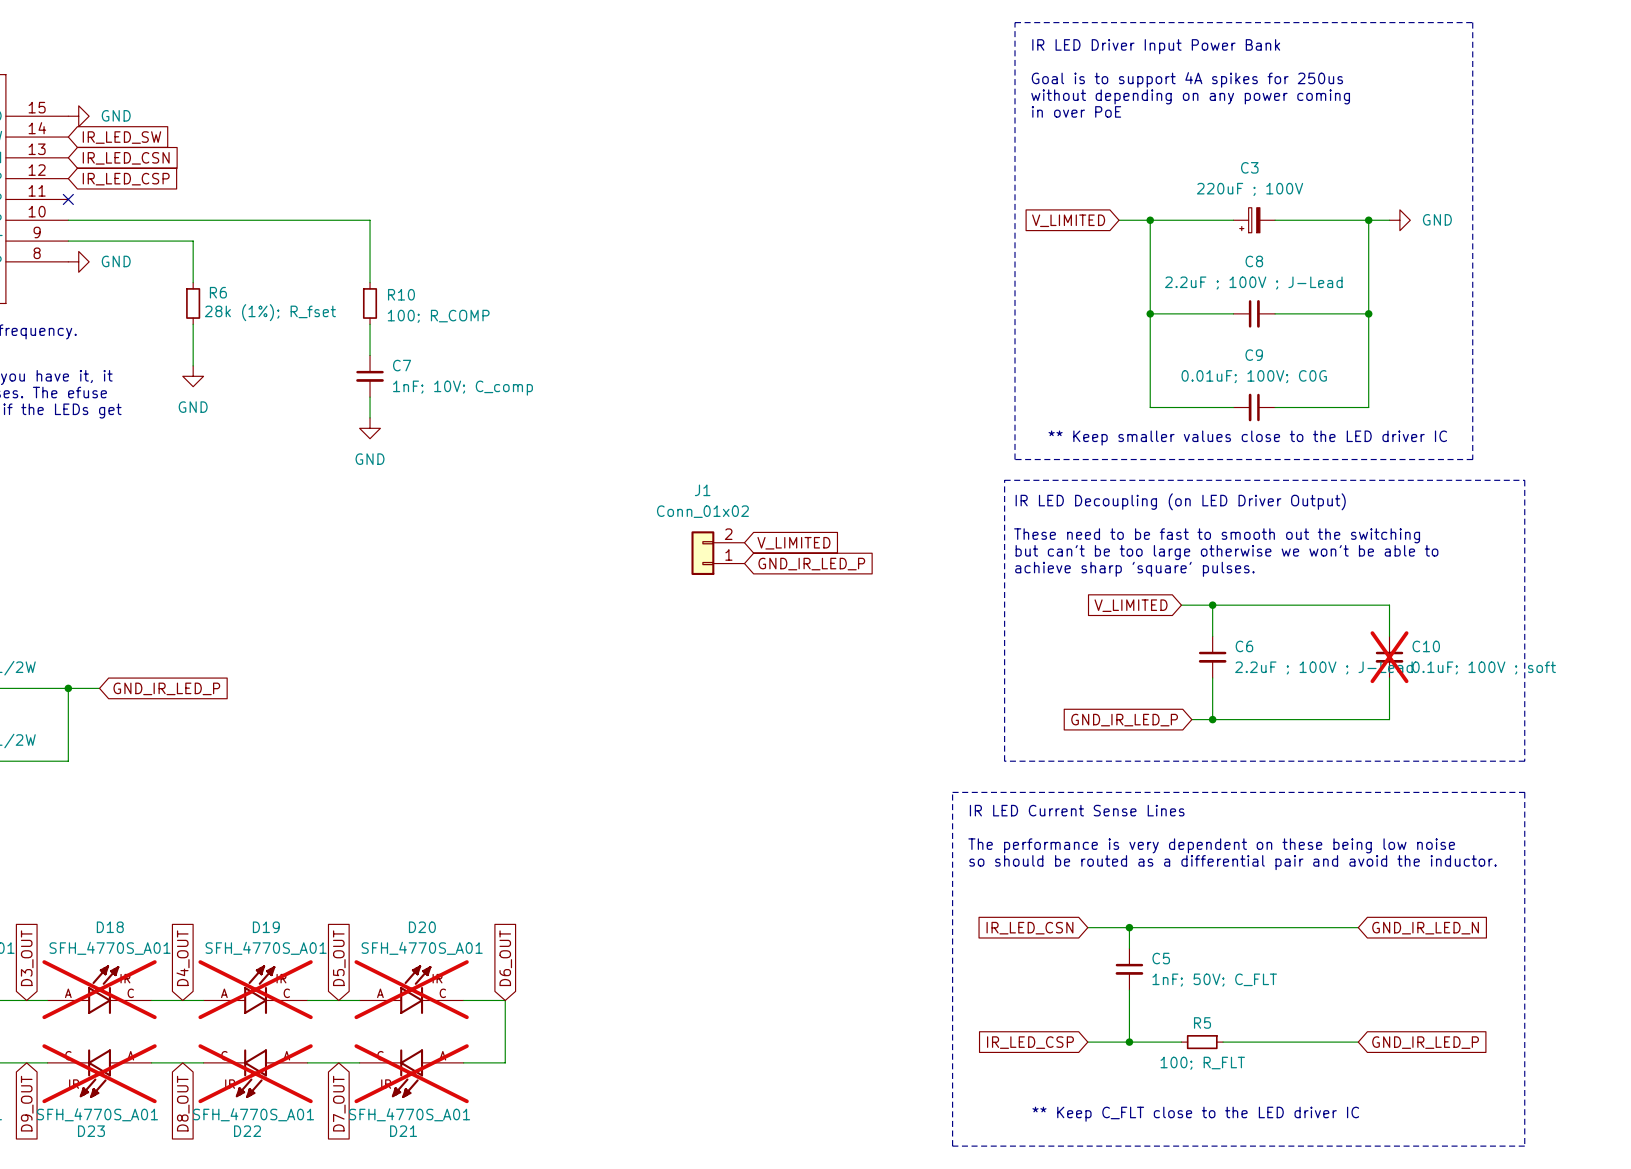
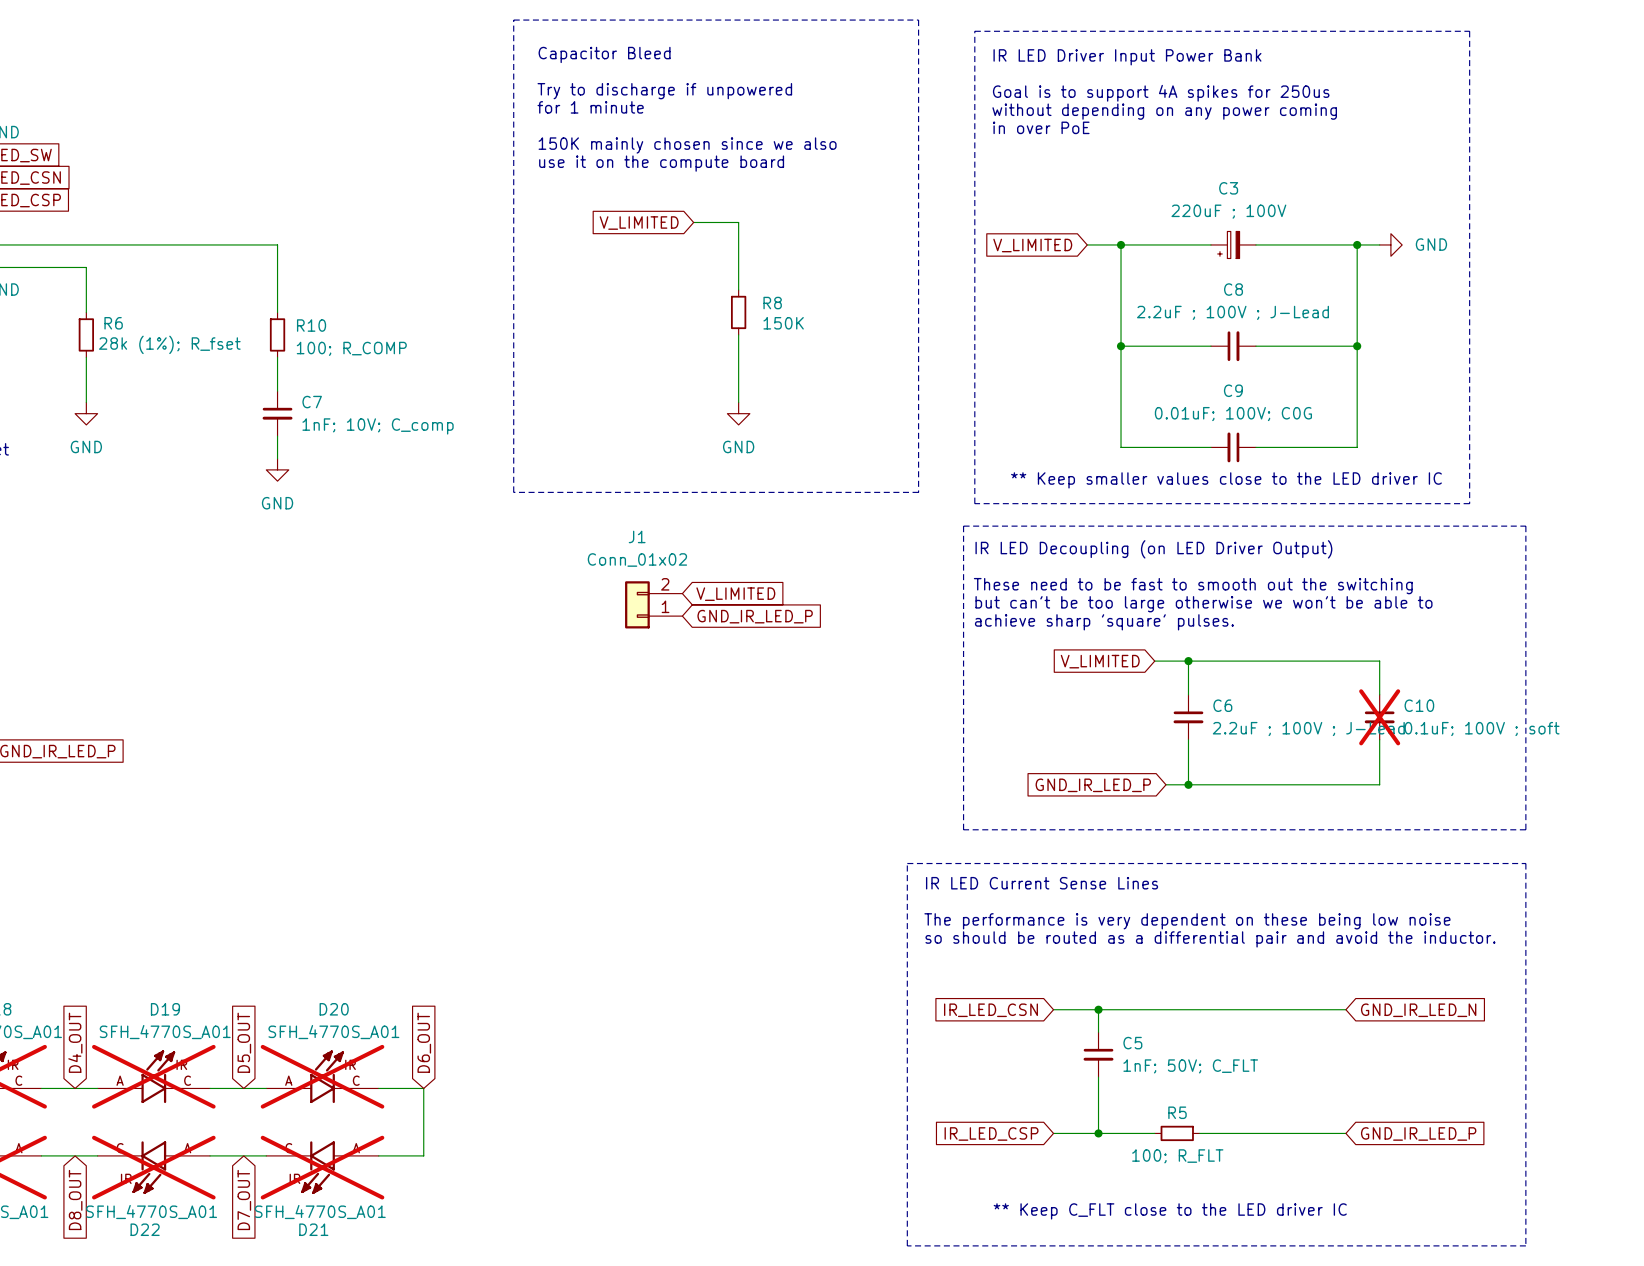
line: none -> (513, 20) (918, 20) (918, 492) (513, 492) (513, 20)
text: none -> Capacitor Bleed (604, 54)
text: none -> Try to discharge if unpowered (664, 91)
text: none -> for 1 minute (590, 107)
text: none -> 150K mainly chosen since we also (687, 145)
text: none -> use it on the compute board (661, 163)
global label: none -> V_LIMITED (639, 223)
wire: none -> (693, 222) (738, 222) (738, 289)
R8: none -> 150K (738, 312)
wire: none -> (738, 334) (738, 402)
power symbol: none -> GND (738, 413)

